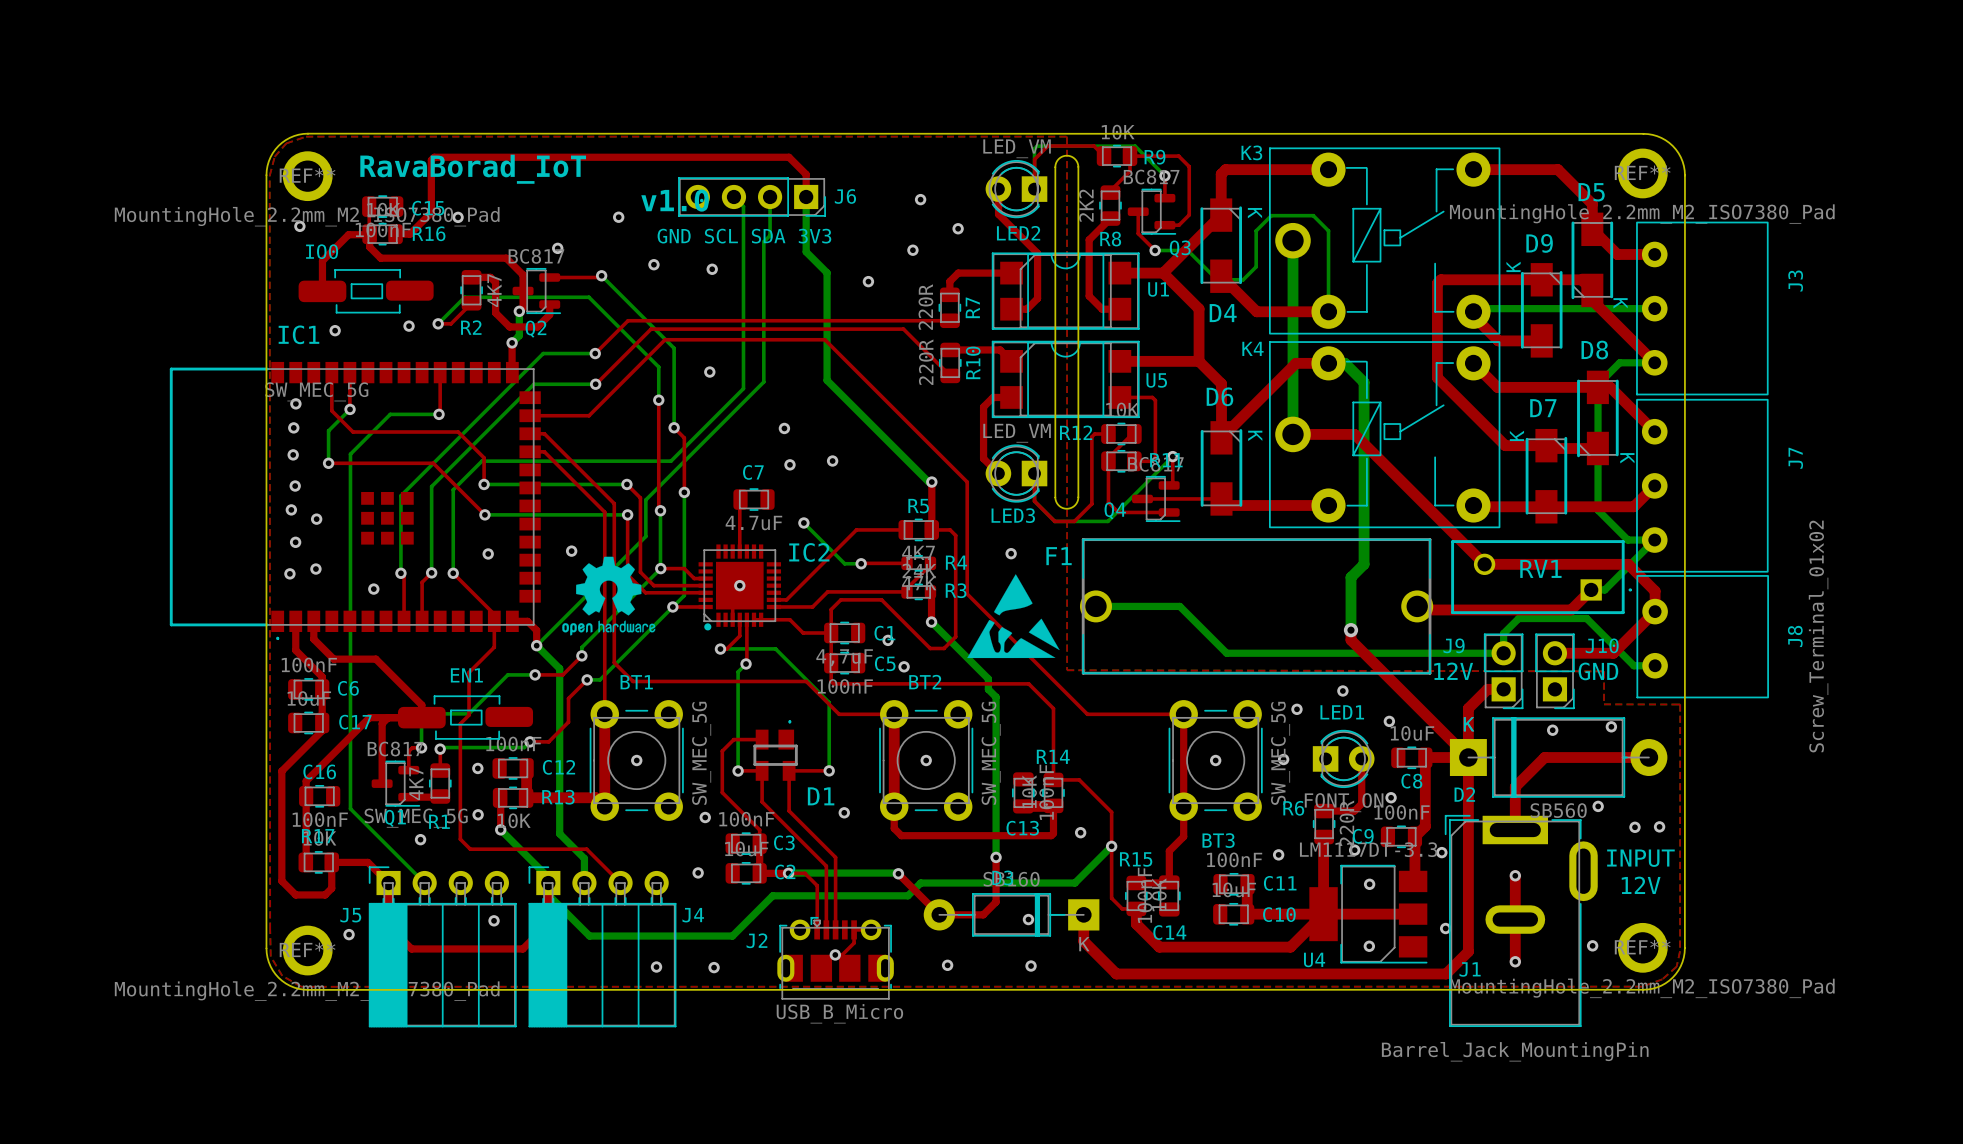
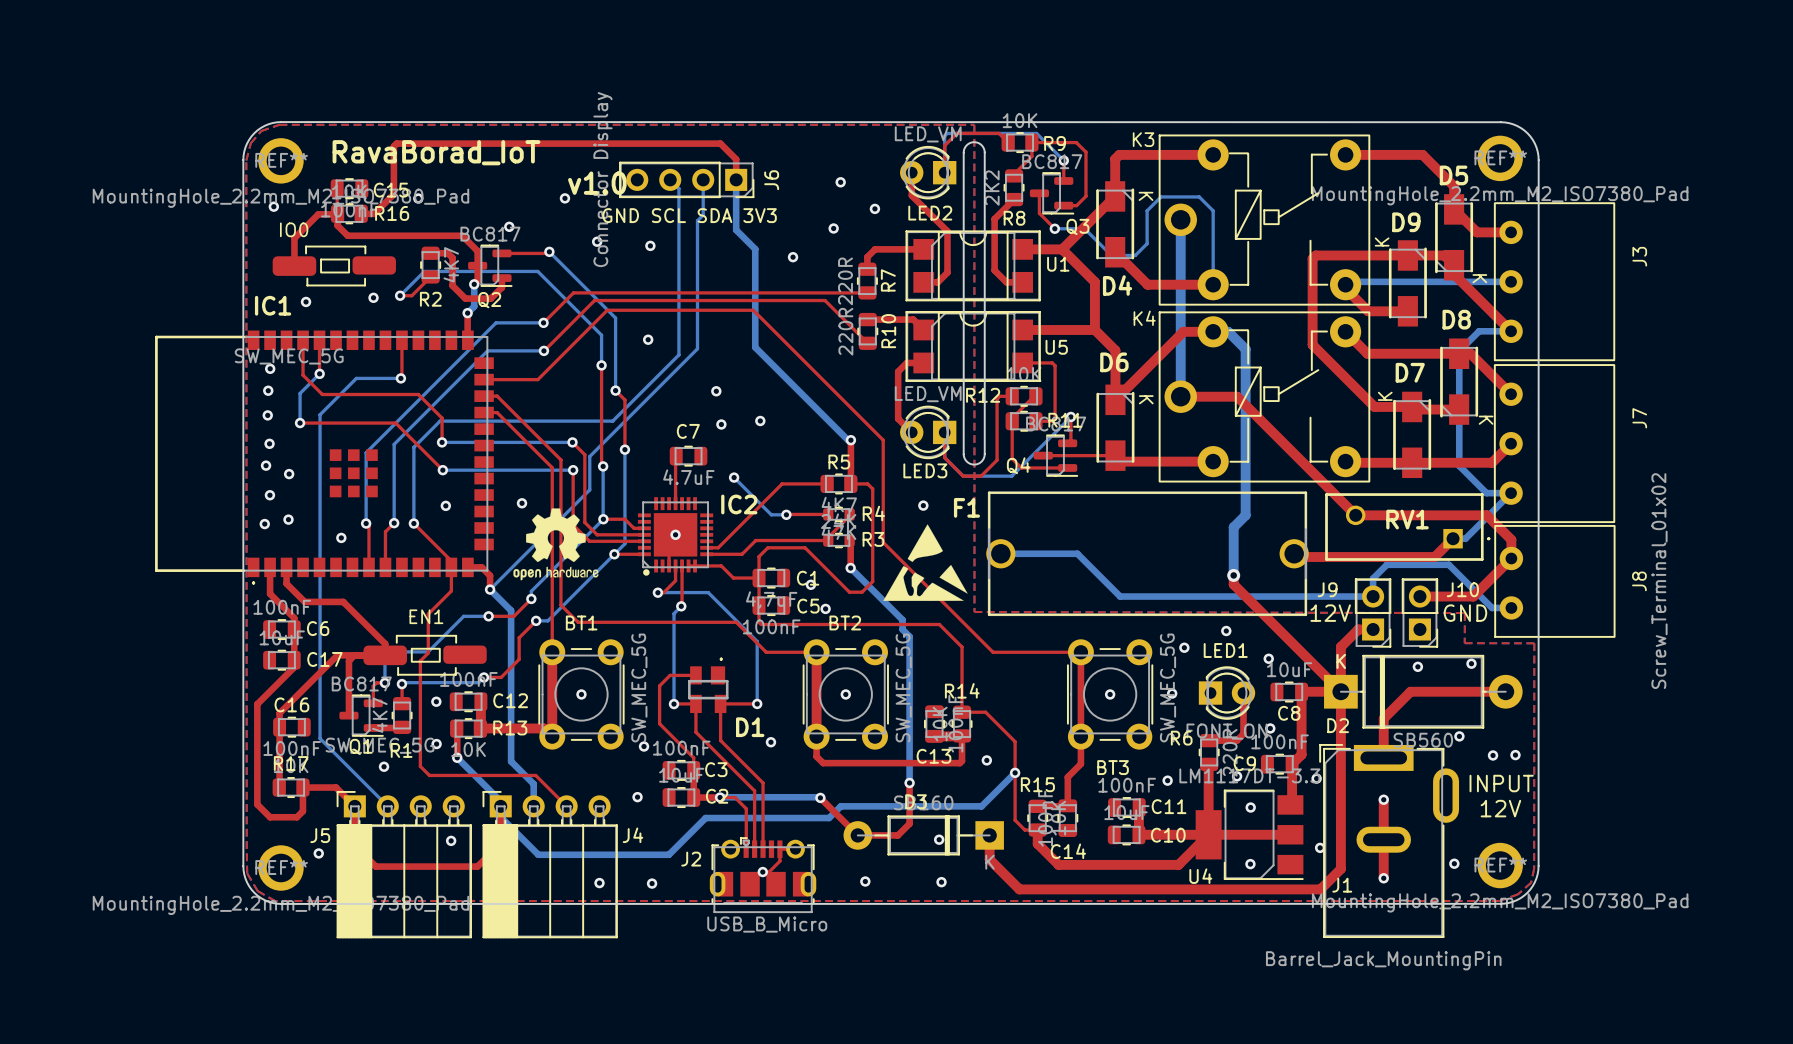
J6 value: none -> Connector Display (602, 179)
J6 name rotation: 0° (845, 196) -> 90° counterclockwise (771, 180)

